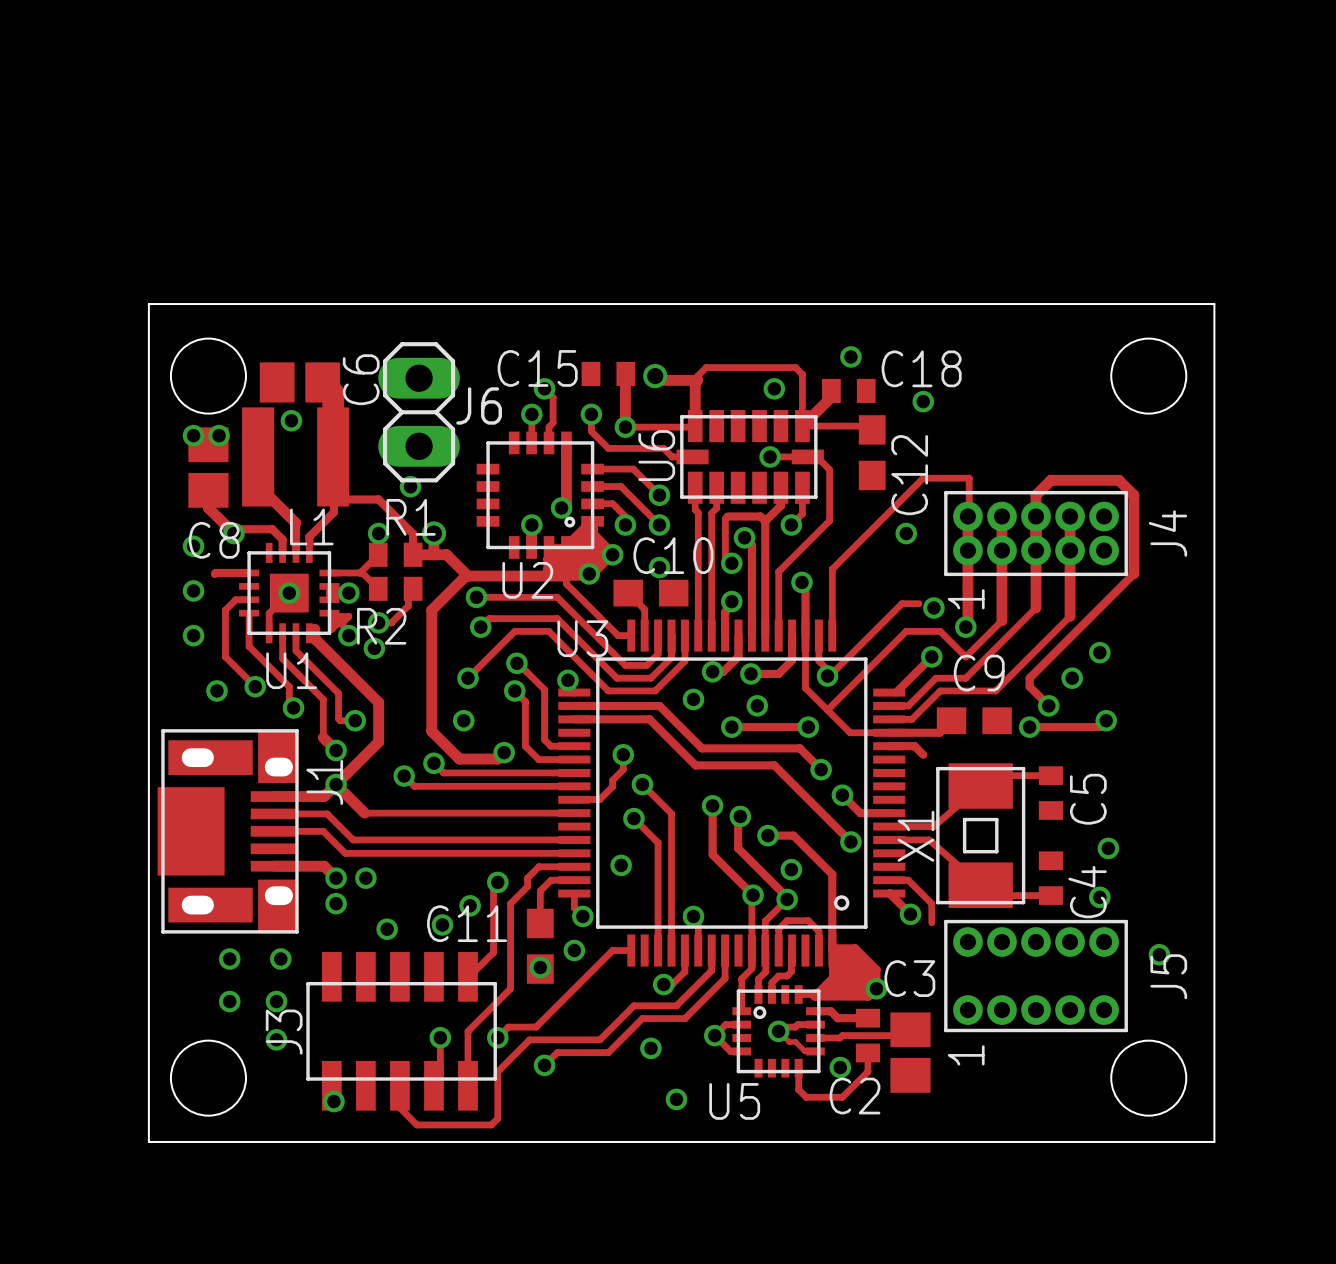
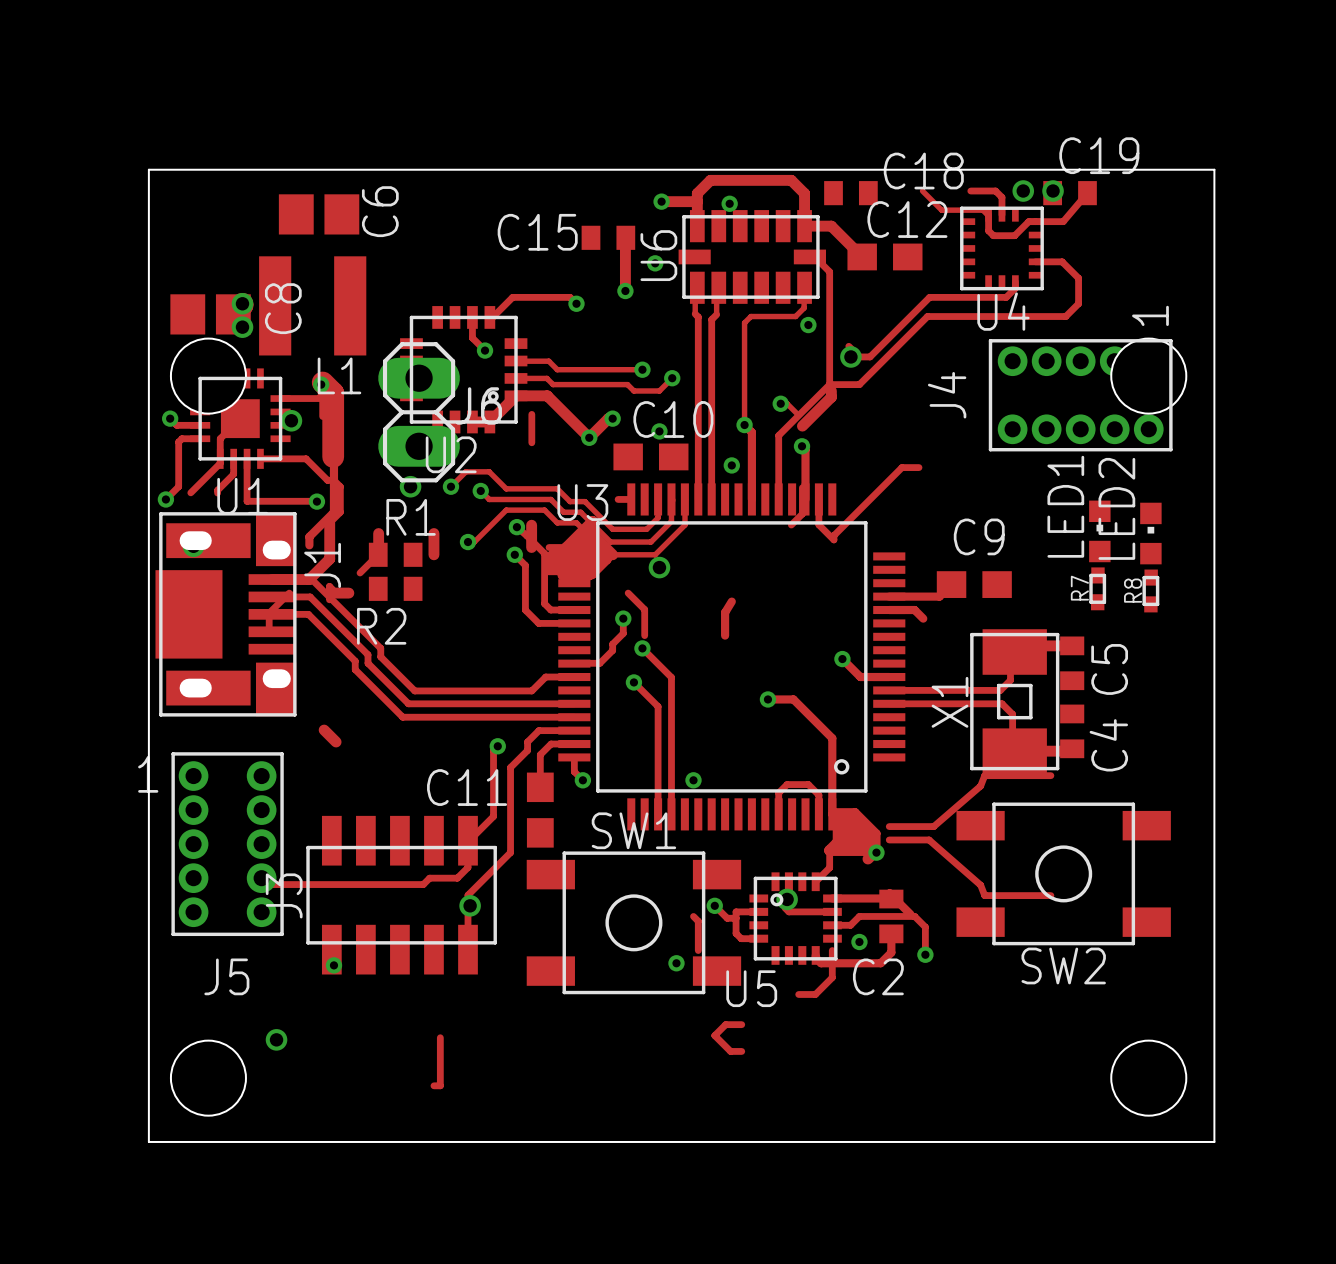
track: none -> (922, 191) (941, 210) (982, 210) (988, 214) (988, 230) (993, 235) (1014, 235) (1028, 221) (1063, 221) (1087, 193)
track: none -> (970, 191) (995, 191) (1001, 197) (1001, 214)
via: none -> (1023, 191)
via: none -> (1053, 191)
C19: none -> (1070, 193)
track: none -> (661, 201) (697, 201)
via: none -> (661, 201)
via: none -> (729, 203)
track: none -> (697, 226) (697, 193) (710, 180) (791, 180) (804, 193) (804, 226) (831, 226) (862, 256)
track: none -> (625, 237) (625, 291)
U4: none -> (1001, 248)
track: none -> (809, 256) (814, 256) (829, 271) (829, 384)
track: none -> (1035, 261) (1062, 261) (1078, 278) (1078, 303) (1065, 316) (927, 316) (859, 384) (829, 384)
via: none -> (655, 263)
track: none -> (1015, 281) (1015, 288) (1006, 297) (929, 297) (870, 356) (859, 356) (848, 346)
track: none -> (697, 287) (695, 289) (695, 313) (698, 317) (698, 499)
track: none -> (718, 287) (716, 289) (716, 314) (711, 319) (711, 499)
track: none -> (804, 287) (804, 308) (795, 316) (750, 316) (744, 322) (744, 425) (751, 432) (751, 499)
via: none -> (625, 291)
via: none -> (242, 303)
track: none -> (576, 303) (570, 297) (512, 297) (492, 317) (489, 317)
via: none -> (576, 303)
board edge: (148, 304) (1214, 304) -> (148, 304) (148, 169) (1214, 169) (1214, 304)
track: none -> (472, 317) (472, 338) (485, 350)
via: none -> (808, 325)
via: none -> (242, 327)
via: none -> (485, 350)
track: none -> (516, 361) (548, 361) (557, 369) (642, 369)
via: none -> (642, 369)
C15 position: (608, 373) -> (608, 237)
track: (625, 373) (625, 427) (694, 427) (695, 382) (697, 380) -> none
track: (655, 376) (659, 380) (697, 380) -> none
via: (655, 376) -> none
track: none -> (672, 378) (659, 390) (633, 390) (627, 384) (553, 384) (546, 378) (516, 378)
via: none -> (672, 378)
track: (697, 380) (697, 376) (706, 367) (795, 367) (802, 374) (802, 426) -> none
C6 position: (299, 382) -> (319, 214)
track: none -> (321, 384) (322, 416)
via: none -> (321, 384)
track: none -> (829, 384) (778, 435) (778, 499)
track: (544, 388) (553, 397) (553, 422) (549, 426) (549, 442) -> none
via: (544, 388) -> none
via position: (774, 388) -> (780, 403)
C18 position: (848, 390) -> (850, 193)
track: none -> (280, 398) (322, 398)
via: (923, 401) -> none
track: none -> (780, 403) (787, 403) (798, 415)
via: (531, 414) -> none
track: (591, 414) (591, 431) (608, 448) (663, 448) (672, 456) (692, 456) -> none
via: (591, 414) -> none
track: none -> (170, 418) (176, 425) (200, 425)
via: none -> (170, 418)
track: none -> (240, 418) (220, 438) (220, 463) (190, 492)
track: none -> (612, 418) (608, 418) (589, 437) (547, 395) (516, 395) (489, 421) (472, 421)
via: none -> (744, 425)
track: (802, 426) (868, 426) (872, 429) -> none
via position: (625, 427) -> (612, 418)
via: none -> (659, 431)
via: (193, 435) -> none
via: (219, 435) -> none
via: none -> (589, 437)
track: none -> (200, 438) (181, 438) (178, 442) (178, 486) (165, 499)
track: (566, 442) (566, 503) (561, 508) -> none
track: none -> (802, 446) (805, 449) (805, 499)
via: none -> (802, 446)
C12 rotation: 0° (872, 452) -> 90° clockwise (884, 256)
C12 position: (872, 452) -> (884, 256)
track: (258, 456) (259, 486) (295, 523) (295, 552) -> none
L1 position: (295, 456) -> (312, 305)
U6 position: (750, 456) -> (752, 256)
track: (770, 456) (816, 456) (829, 469) (829, 520) (778, 571) (778, 635) -> none
via: (770, 456) -> none
track: none -> (233, 458) (233, 474) (217, 490) (217, 493)
track: none -> (247, 458) (247, 501) (316, 501)
track: none -> (260, 458) (306, 458) (327, 480) (333, 480) (340, 486) (340, 512) (329, 522) (329, 559) (309, 579) (272, 579)
via: none -> (731, 465)
C8 rotation: 0° (208, 467) -> 90° clockwise (210, 314)
C8 position: (208, 467) -> (210, 314)
track: (592, 469) (633, 469) (659, 495) -> none
C12 name position: C12 (909, 475) -> C12 (907, 219)
track: none -> (450, 486) (465, 471) (489, 471) (506, 488) (557, 488) (570, 501) (585, 501) (612, 529) (646, 529) (658, 517) (658, 499)
via: none -> (450, 486)
track: (592, 486) (620, 486) (659, 525) -> none
track: (695, 487) (695, 509) (698, 512) (698, 635) -> none
track: (716, 487) (716, 508) (711, 513) (711, 635) -> none
track: (782, 489) (780, 487) (780, 505) (765, 521) -> none
track: (208, 490) (208, 508) (233, 533) (238, 529) (272, 529) (282, 539) (282, 552) -> none
track: none -> (480, 490) (489, 499) (550, 499) (563, 512) (580, 512) (610, 542) (650, 542) (671, 521) (672, 500)
via: none -> (480, 490)
J4 footprint: [944, 490, 1128, 577] -> [988, 339, 1173, 452]
U2 position: (540, 495) -> (463, 369)
via: (659, 495) -> none
via: none -> (165, 499)
track: (333, 499) (378, 499) (413, 533) (413, 554) (446, 554) (468, 576) -> none
track: none -> (618, 499) (631, 499)
track: none -> (684, 499) (684, 525) (655, 554) (608, 554) (576, 522) (557, 522) (544, 510) (506, 510) (474, 542) (468, 542)
via: none -> (316, 501)
track: (592, 503) (612, 503) (625, 516) (625, 525) -> none
via: (561, 508) -> none
track: (967, 516) (967, 625) (965, 627) -> none
track: (1001, 516) (1001, 620) (965, 656) (940, 631) (906, 631) (827, 710) -> none
track: (1070, 516) (1070, 616) (995, 690) (940, 690) (911, 719) (889, 719) -> none
track: (765, 521) (765, 635) -> none
track: (765, 521) (760, 516) (727, 516) (725, 518) (725, 556) (731, 563) -> none
via position: (531, 525) -> (516, 527)
via: (625, 525) -> none
via: (659, 525) -> none
via: (791, 525) -> none
L1 name position: L1 (311, 526) -> L1 (339, 375)
LED1: none -> (1099, 531)
via: (233, 533) -> none
via: (378, 533) -> none
via: (433, 533) -> none
via: (906, 533) -> none
LED2: none -> (1150, 533)
J4 name position: J4 (1167, 533) -> J4 (947, 395)
track: (744, 537) (751, 545) (751, 635) -> none
via: (744, 537) -> none
C8 name position: C8 (214, 540) -> C8 (283, 308)
via: none -> (468, 542)
track: (967, 550) (969, 478) (923, 478) (832, 569) (832, 635) -> none
via: none -> (514, 554)
via: (612, 554) -> none
via: (731, 563) -> none
track: (566, 571) (566, 583) (618, 635) (631, 635) -> none
track: (566, 571) (562, 576) (468, 576) -> none
track: (249, 572) (214, 573) -> none
track: (329, 572) (362, 572) (378, 588) -> none
via: (589, 573) -> none
track: (468, 576) (431, 610) (431, 731) (459, 759) (497, 759) (504, 752) -> none
track: none -> (310, 578) (380, 648) (380, 656) (414, 690) (531, 690) (545, 677) (574, 677)
track: (802, 582) (805, 585) (805, 688) (850, 732) (939, 732) (951, 720) -> none
via: (802, 582) -> none
track: none -> (951, 584) (939, 596) (889, 596)
track: (413, 588) (408, 593) (408, 605) (391, 622) (378, 622) -> none
R7: none -> (1097, 588)
via: (193, 590) -> none
R8: none -> (1150, 590)
U1 position: (289, 593) -> (240, 418)
via: (289, 593) -> none
via: (348, 593) -> none
C10 position: (650, 593) -> (650, 456)
track: none -> (272, 596) (310, 596) (368, 654) (368, 663) (408, 703) (574, 703)
track: (476, 597) (557, 597) (625, 665) (646, 665) (658, 654) (658, 635) -> none
via: (476, 597) -> none
track: (249, 599) (235, 599) (225, 610) (225, 656) (255, 686) -> none
via: (731, 601) -> none
track: (919, 603) (901, 603) (833, 671) (833, 676) (818, 661) (818, 635) -> (919, 467) (901, 467) (833, 535) (833, 539) (818, 524) (818, 499)
via: (933, 607) -> none
track: (249, 613) (249, 646) (289, 686) (289, 703) (293, 707) -> none
track: (329, 613) (331, 615) (331, 629) (336, 625) (336, 614) (338, 616) (348, 616) (340, 622) (348, 631) (348, 635) -> none
track: none -> (272, 614) (308, 614) (355, 661) (355, 669) (402, 717) (574, 717)
via: none -> (623, 618)
via: (378, 622) -> none
track: (480, 627) (489, 618) (557, 618) (616, 678) (650, 678) (671, 657) (671, 635) (672, 652) -> none
via: (480, 627) -> none
via: (965, 627) -> none
track: (314, 629) (314, 638) (378, 702) (378, 742) (324, 796) (274, 796) (289, 797) -> none
track: (282, 633) (282, 658) (323, 699) (323, 737) (336, 750) -> none
track: (295, 633) (295, 650) (338, 693) (338, 718) (340, 720) (355, 720) -> none
via: (193, 635) -> none
via: (348, 635) -> none
track: (684, 635) (684, 661) (655, 690) (608, 690) (548, 631) (514, 631) (468, 678) -> none
track: (738, 635) (738, 656) (723, 671) (712, 671) -> none
track: (792, 635) (792, 660) (778, 673) (750, 673) -> none
track: none -> (1072, 645) (1020, 645) (1010, 656) (1010, 680) (1000, 690) (889, 690)
via: (374, 648) -> none
via: none -> (642, 648)
via: (1099, 652) -> none
track: (931, 656) (896, 692) (889, 692) -> none
via: (931, 656) -> none
track: (516, 663) (544, 689) (544, 739) (550, 746) (574, 746) -> (516, 527) (544, 553) (544, 603) (550, 610) (574, 610)
via: (516, 663) -> none
via: (712, 671) -> none
via: (750, 673) -> none
via position: (827, 676) -> (842, 659)
via: (468, 678) -> none
via: (1072, 678) -> none
via: (567, 680) -> none
via: none -> (633, 682)
via: (255, 686) -> none
via: (216, 690) -> none
track: (514, 690) (525, 701) (525, 746) (538, 759) (574, 759) -> (514, 554) (525, 565) (525, 610) (538, 623) (574, 623)
via: (514, 690) -> none
via: (693, 699) -> none
track: none -> (889, 703) (1002, 703) (1012, 714) (1012, 749) (1014, 751) (1069, 751) (1072, 748)
track: (574, 705) (659, 705) (702, 748) (799, 748) (821, 769) -> none
via position: (757, 705) -> (767, 699)
track: (889, 705) (908, 705) (936, 678) (965, 678) (1036, 607) (1036, 495) (1050, 480) (1118, 480) (1133, 495) (1133, 573) (1029, 678) (1029, 686) (1048, 705) -> none
via: (1048, 705) -> none
via: (293, 707) -> none
track: (574, 719) (649, 719) (695, 765) (774, 765) (850, 842) -> none
via: (355, 720) -> none
via: (463, 720) -> none
C9 position: (974, 720) -> (974, 584)
track: (1106, 720) (1099, 727) (1029, 727) -> none
via: (1106, 720) -> none
track: (731, 727) (808, 727) -> none
via: (731, 727) -> none
via: (808, 727) -> none
via: (1029, 727) -> none
track: none -> (324, 730) (336, 742)
via size: [493, 741, 515, 764] -> [489, 738, 506, 755]
track: (889, 746) (914, 746) (923, 754) -> (889, 610) (914, 610) (923, 618)
via: (336, 750) -> none
track: (623, 754) (623, 769) (612, 780) (612, 786) (599, 799) (574, 799) -> (623, 618) (623, 633) (612, 644) (612, 650) (599, 663) (574, 663)
via: (623, 754) -> none
track: (433, 763) (443, 772) (574, 772) -> none
via: (433, 763) -> none
via: (821, 769) -> none
track: (404, 776) (414, 786) (574, 786) -> none
via: (404, 776) -> none
via: none -> (582, 780)
via: none -> (693, 780)
track: (336, 784) (364, 813) (574, 813) -> none
via: (336, 784) -> none
track: (642, 784) (671, 813) -> (642, 648) (671, 677) (671, 813)
via: (642, 784) -> none
U3 position: (731, 793) -> (731, 656)
C5 position: (1050, 793) -> (1072, 663)
track: (842, 795) (860, 813) (889, 813) -> (842, 659) (860, 677) (889, 677)
via: (842, 795) -> none
track: (712, 805) (712, 854) (753, 895) (751, 968) (741, 978) (741, 1011) -> none
via: (712, 805) -> none
track: (274, 813) (327, 813) (353, 839) (574, 839) -> none
track: (671, 814) (671, 950) -> none
track: (740, 816) (738, 818) (738, 848) (787, 897) (765, 921) (765, 971) (758, 979) (758, 994) -> none
via: (740, 816) -> none
track: (633, 818) (658, 842) (658, 950) -> (633, 682) (658, 706) (658, 814)
via: (633, 818) -> none
J1 position: (228, 831) -> (226, 614)
track: (274, 831) (323, 831) (345, 853) (574, 853) -> none
track: (767, 835) (793, 835) (832, 874) (832, 950) (834, 948) (855, 948) (876, 969) (876, 988) -> (767, 699) (793, 699) (832, 738) (832, 814) (834, 812) (855, 812) (876, 833) (876, 852)
via: (767, 835) -> none
X1 position: (980, 835) -> (1014, 701)
track: none -> (468, 840) (468, 867) (457, 878) (429, 878) (423, 884) (268, 884) (261, 878)
via: (850, 842) -> none
track: none -> (853, 844) (844, 844) (846, 842) (846, 827) (865, 846) (865, 850) (829, 850)
via: (1108, 848) -> none
track: none -> (829, 850) (829, 867) (815, 881)
track: none -> (829, 850) (838, 842) (838, 818) (853, 818) (874, 839) (874, 852) (867, 859)
via: none -> (876, 852)
via: (621, 865) -> none
track: (274, 866) (324, 866) (336, 878) -> none
track: (574, 866) (538, 866) (527, 878) (527, 886) (510, 903) (510, 988) (468, 1031) (468, 1085) -> (574, 730) (538, 730) (527, 742) (527, 750) (510, 767) (510, 852) (468, 895) (468, 949)
via: (791, 869) -> none
SW2: none -> (1063, 873)
via: (336, 878) -> none
via: (365, 878) -> none
C4 position: (1050, 878) -> (1072, 731)
track: (574, 880) (551, 880) (540, 890) (540, 923) (544, 919) -> (574, 744) (551, 744) (540, 754) (540, 787) (544, 783)
track: (889, 880) (908, 880) (931, 903) (931, 922) -> none
track: (497, 882) (493, 886) (493, 952) (469, 976) -> (497, 746) (493, 750) (493, 816) (469, 840)
via: (497, 882) -> none
track: (574, 893) (574, 907) (582, 916) -> (574, 757) (574, 771) (582, 780)
via: (753, 895) -> none
via: (1099, 897) -> none
track: none -> (832, 898) (891, 899)
via: (336, 903) -> none
track: none -> (714, 905) (727, 918) (736, 918)
via: none -> (714, 905)
track: none -> (784, 907) (788, 911) (832, 911)
track: none -> (758, 911) (736, 911) (736, 933) (741, 938) (758, 938)
via: (910, 914) -> none
via: (582, 916) -> none
via: (693, 916) -> none
SW1: none -> (633, 922)
via: (442, 924) -> none
track: none -> (832, 925) (850, 925) (859, 916) (914, 916) (925, 927) (925, 954)
via: (387, 929) -> none
track: none -> (891, 933) (891, 952) (880, 963) (821, 963) (815, 955)
via: none -> (859, 941)
C11 position: (540, 946) -> (540, 810)
via: (574, 950) -> none
track: (631, 950) (612, 950) (536, 1027) (508, 1027) (497, 1037) -> none
track: (684, 950) (684, 971) (672, 984) (663, 984) -> none
track: (711, 950) (711, 970) (676, 1005) (633, 1005) (599, 1039) (529, 1039) (497, 1071) (497, 1118) (491, 1124) (416, 1124) (399, 1107) (399, 1085) -> none
track: (725, 950) (725, 978) (684, 1018) (642, 1018) (608, 1052) (557, 1052) (544, 1065) -> none
track: (778, 950) (778, 929) (787, 920) (808, 920) (818, 931) (818, 950) -> (778, 814) (778, 792) (787, 784) (808, 784) (818, 795) (818, 814)
track: (792, 950) (791, 971) (787, 976) (778, 976) (771, 982) (771, 994) -> none
via: none -> (925, 954)
via: (1159, 954) -> none
via: (229, 959) -> none
via: (280, 959) -> none
via: none -> (676, 963)
via: none -> (333, 965)
via: (540, 967) -> none
J5 rotation: 0° (1036, 976) -> 90° clockwise (227, 844)
J5 position: (1036, 976) -> (227, 844)
track: (853, 980) (844, 980) (846, 978) (846, 963) (865, 982) (865, 986) (829, 986) (838, 978) (838, 954) (853, 954) (874, 976) (874, 988) (867, 995) (814, 995) -> none
via: (663, 984) -> none
via: (876, 988) -> none
via: (229, 1001) -> none
via: (276, 1001) -> none
track: (815, 1011) (830, 1011) (837, 1018) (867, 1018) -> none
track: (815, 1024) (782, 1027) (778, 1031) (789, 1041) (795, 1041) (805, 1051) (815, 1051) -> none
track: (910, 1029) (904, 1035) (842, 1035) (839, 1038) (815, 1038) -> none
J3 position: (401, 1031) -> (401, 895)
U5 position: (778, 1031) -> (795, 918)
via: (778, 1031) -> none
via: (714, 1035) -> none
C2 position: (867, 1035) -> (891, 916)
via: (440, 1037) -> none
via: (497, 1037) -> none
via: (650, 1048) -> none
C3: (910, 1052) -> none
track: (867, 1053) (867, 1071) (842, 1097) (806, 1097) (798, 1089) (798, 1068) -> none
via: (544, 1065) -> none
via: (840, 1067) -> none
via: (676, 1099) -> none
via: (333, 1101) -> none

